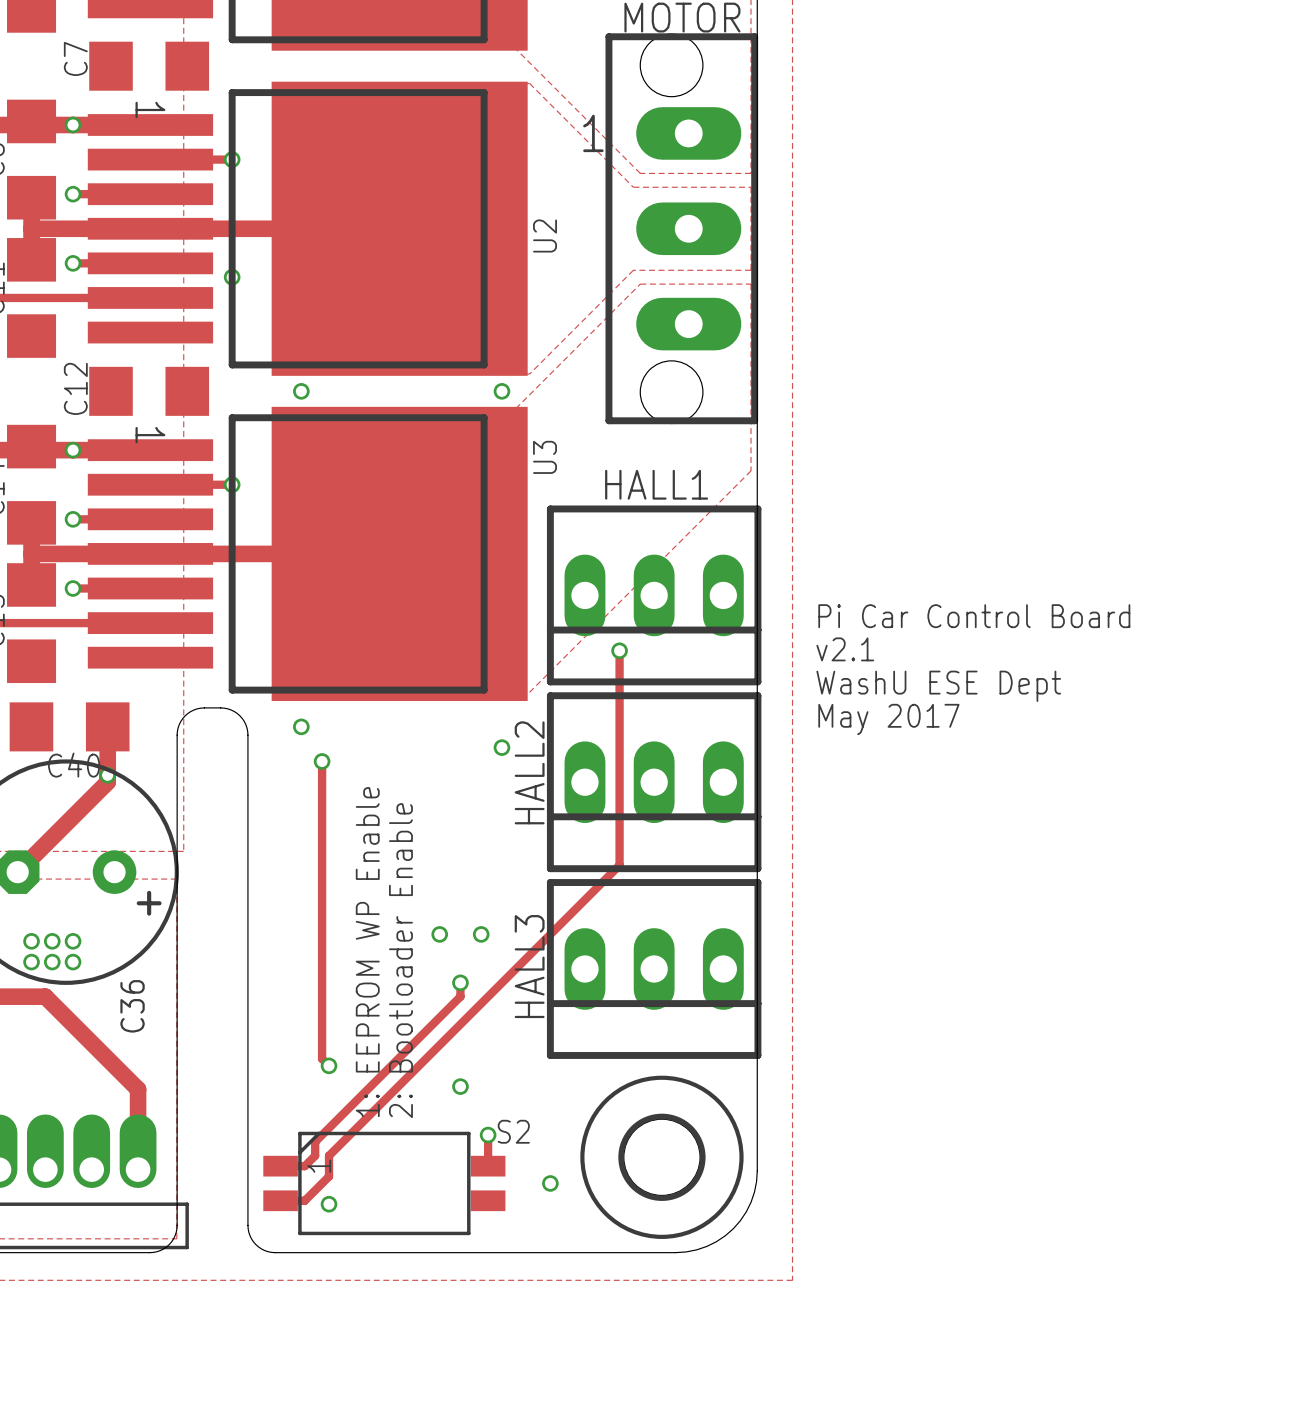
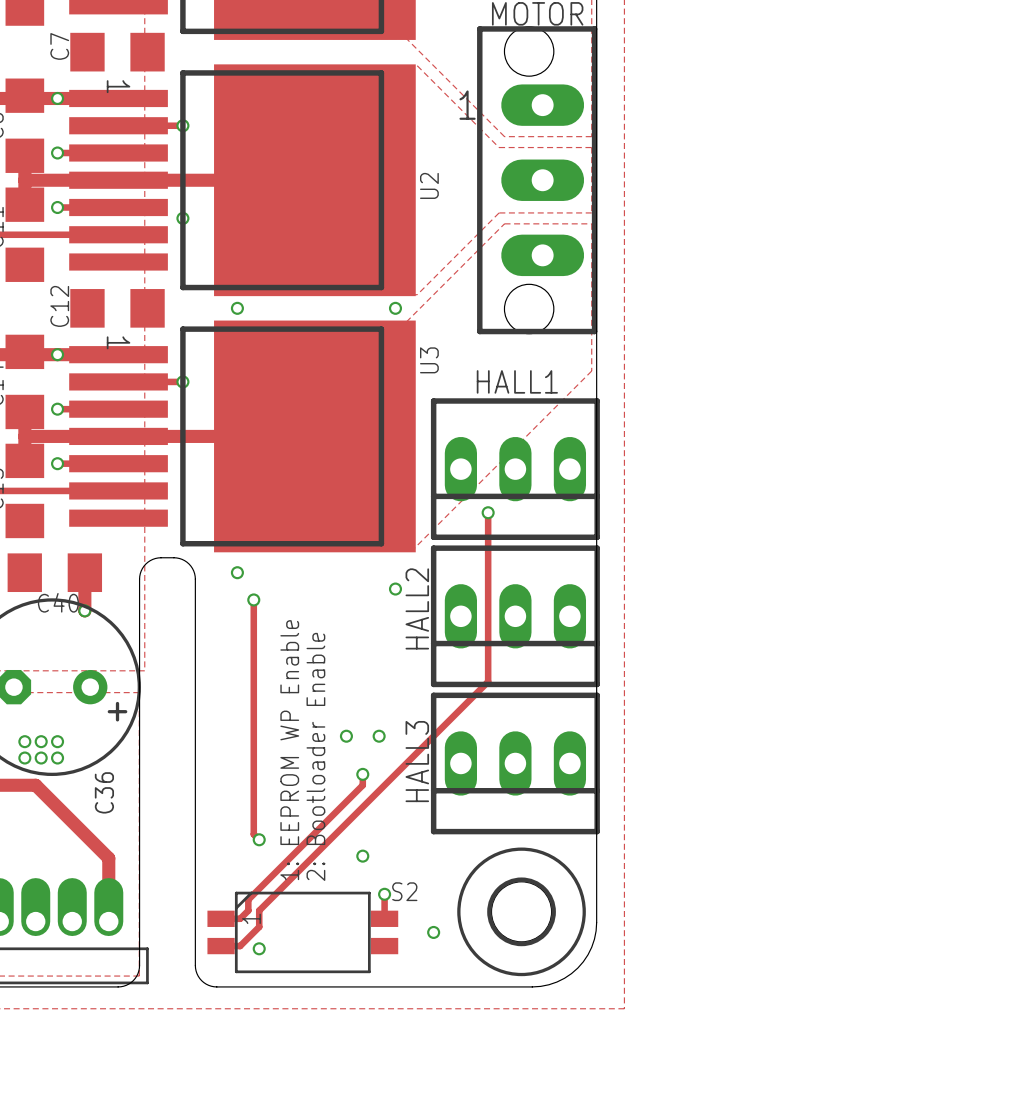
text: Pi Car Control Board (974, 616) -> none
text: v2.1 (845, 649) -> none
text: WashU ESE Dept (938, 686) -> none
text: May 2017 (888, 719) -> none
track: (107, 775) (107, 782) (17, 872) -> none

